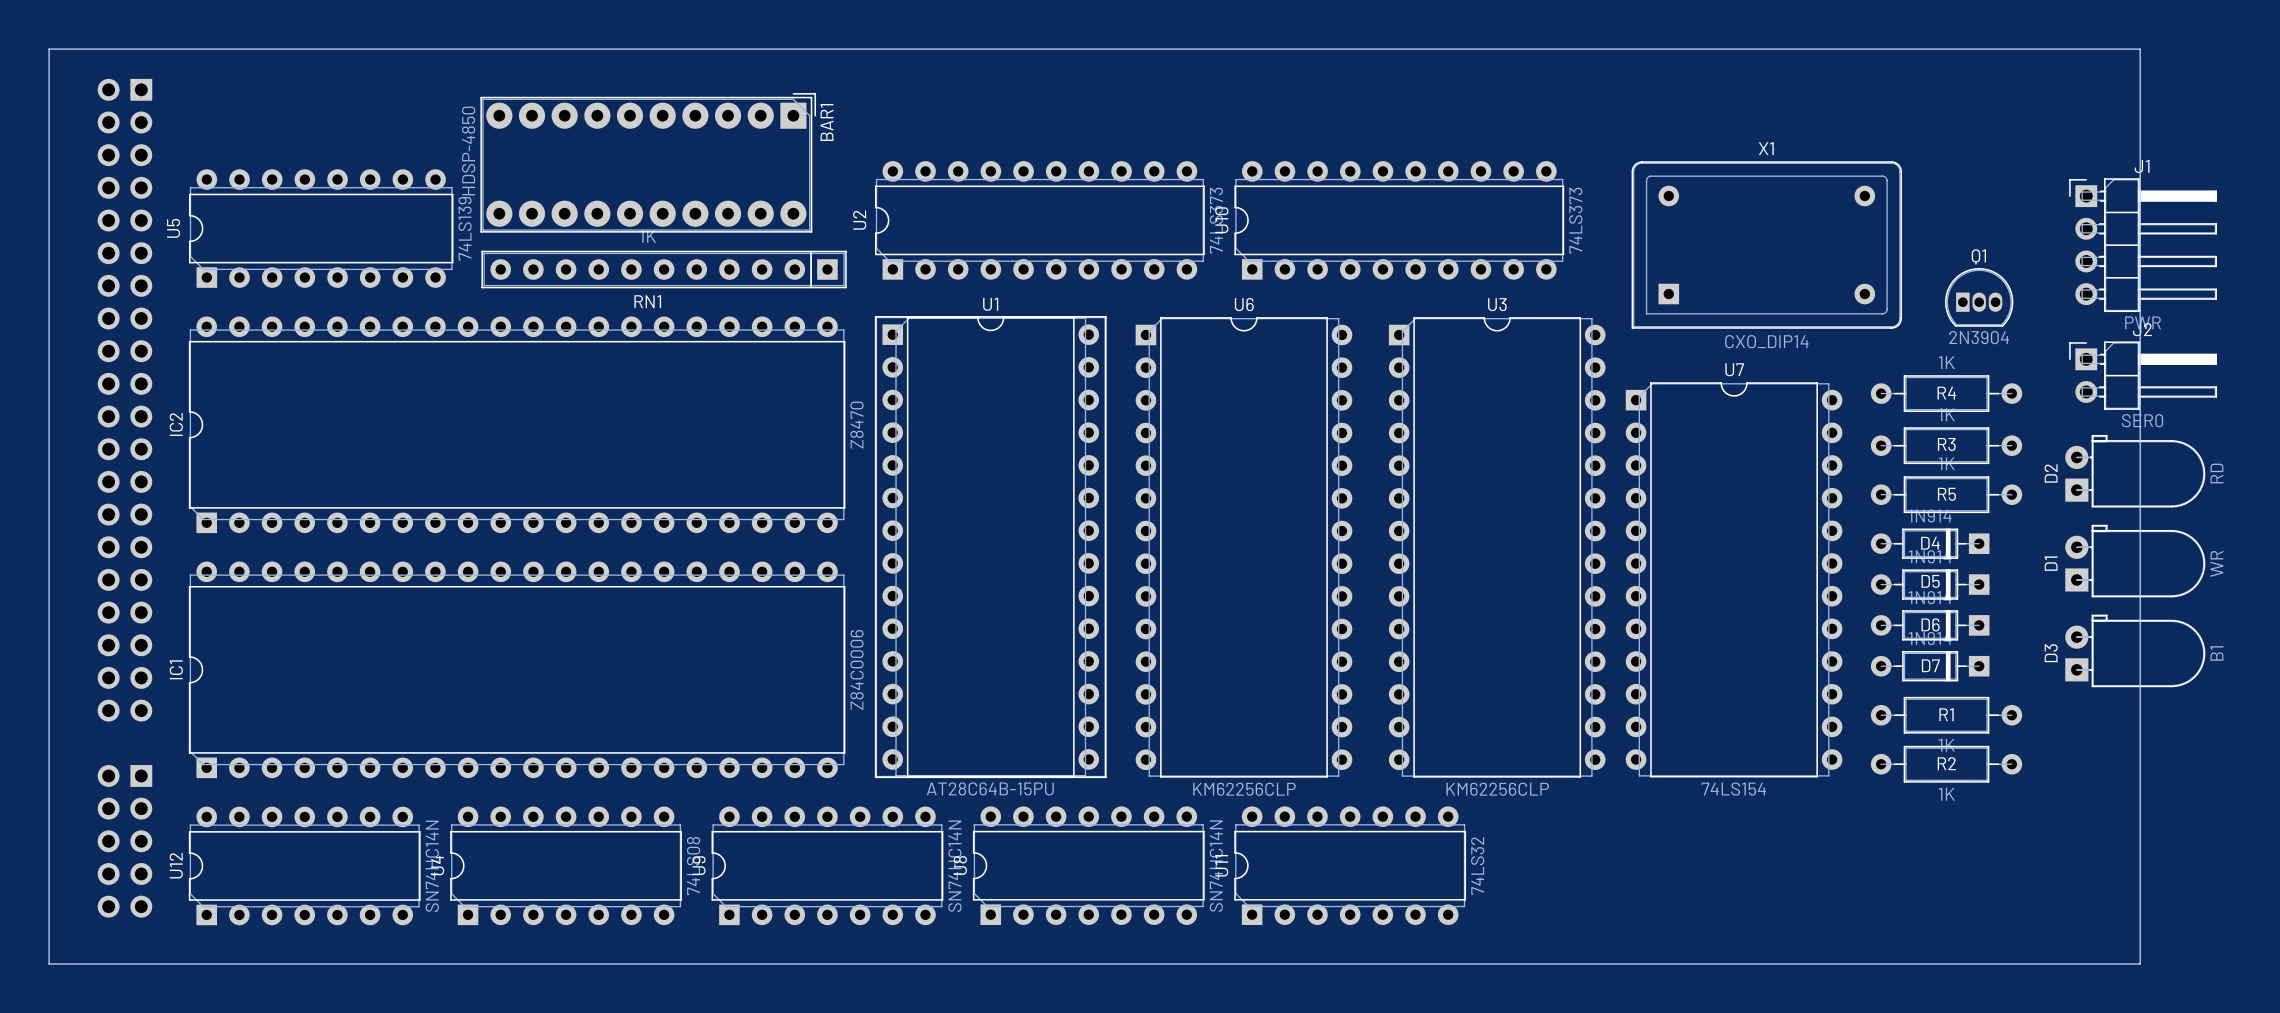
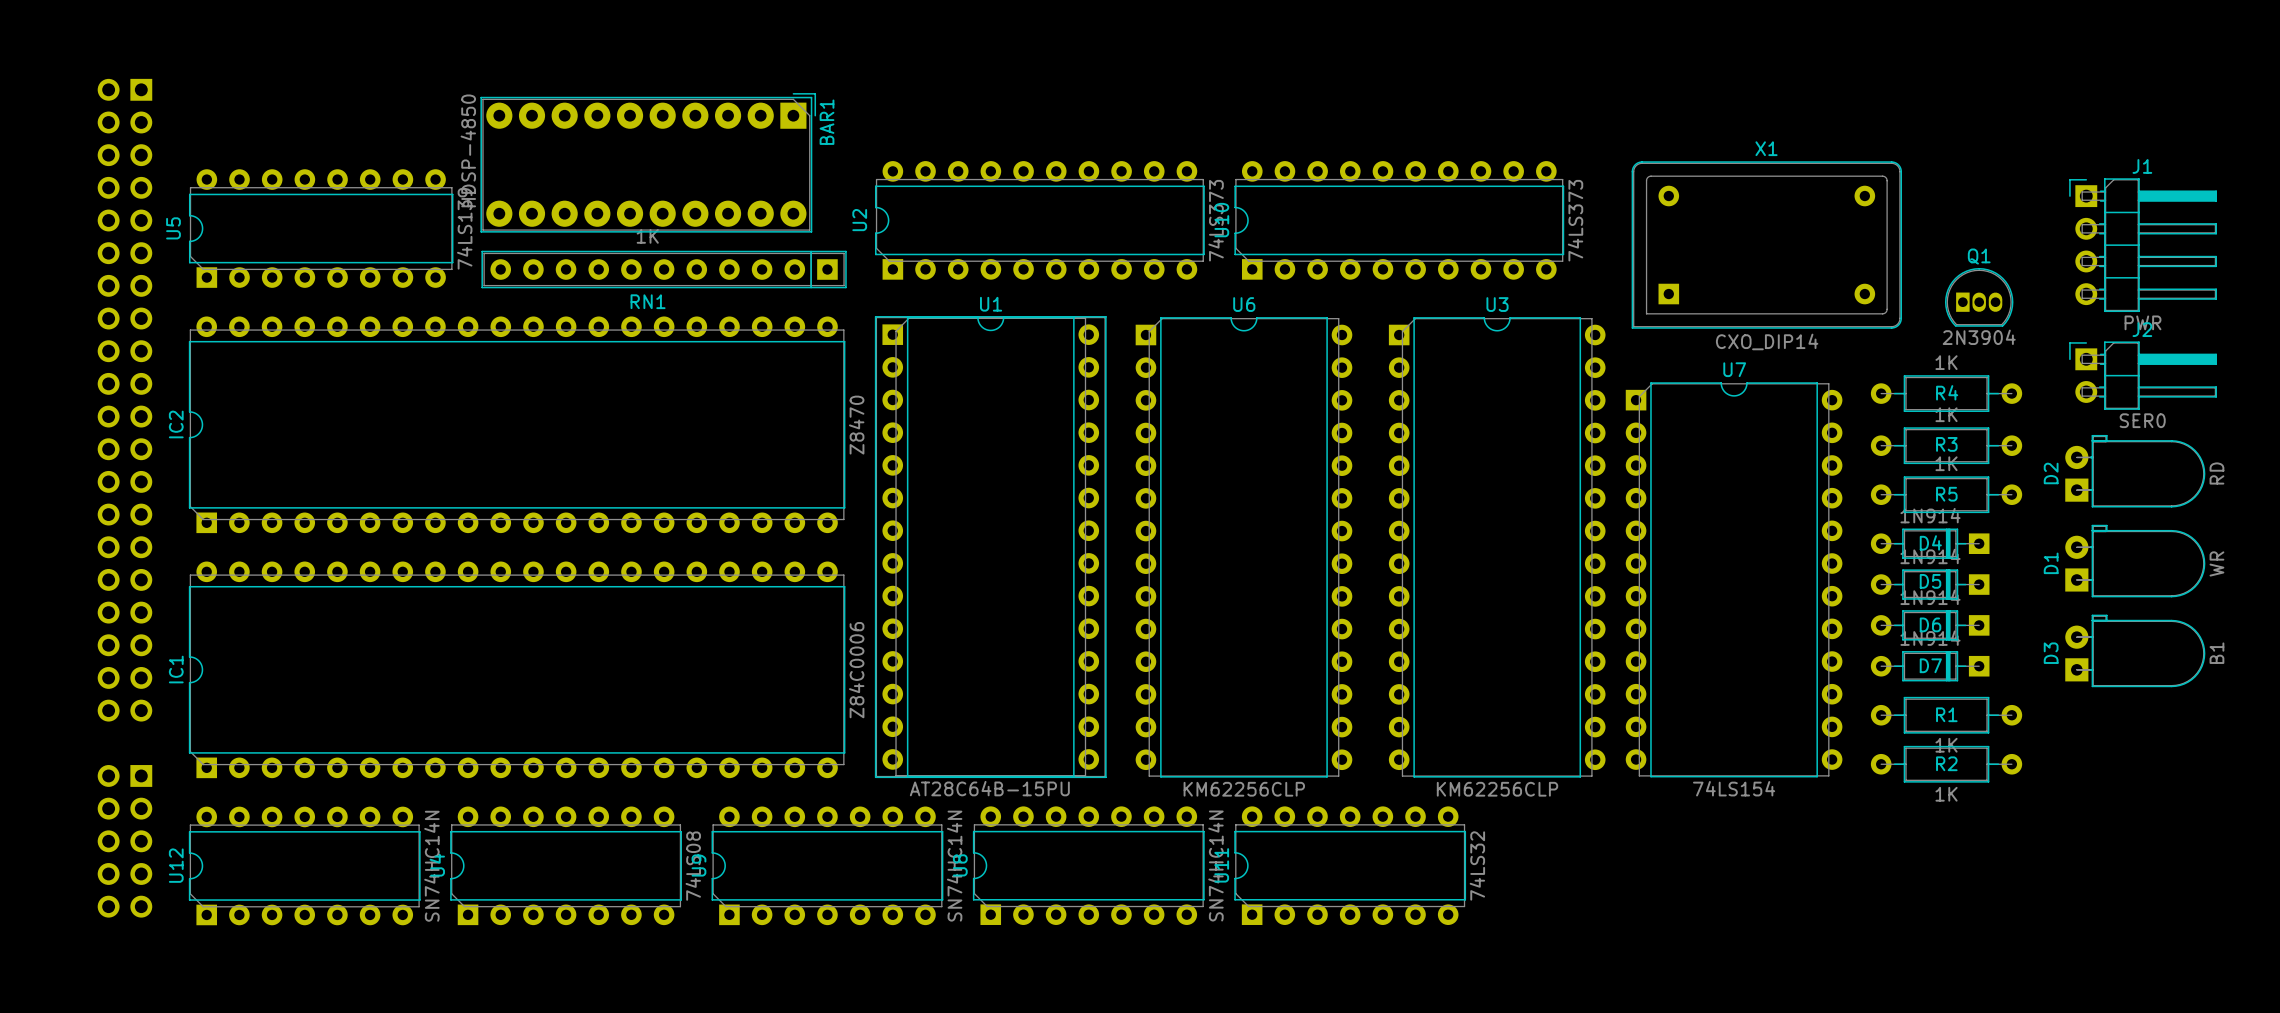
board edge: (49, 49) (49, 963) (2140, 963) (2140, 49) (49, 49) -> none

